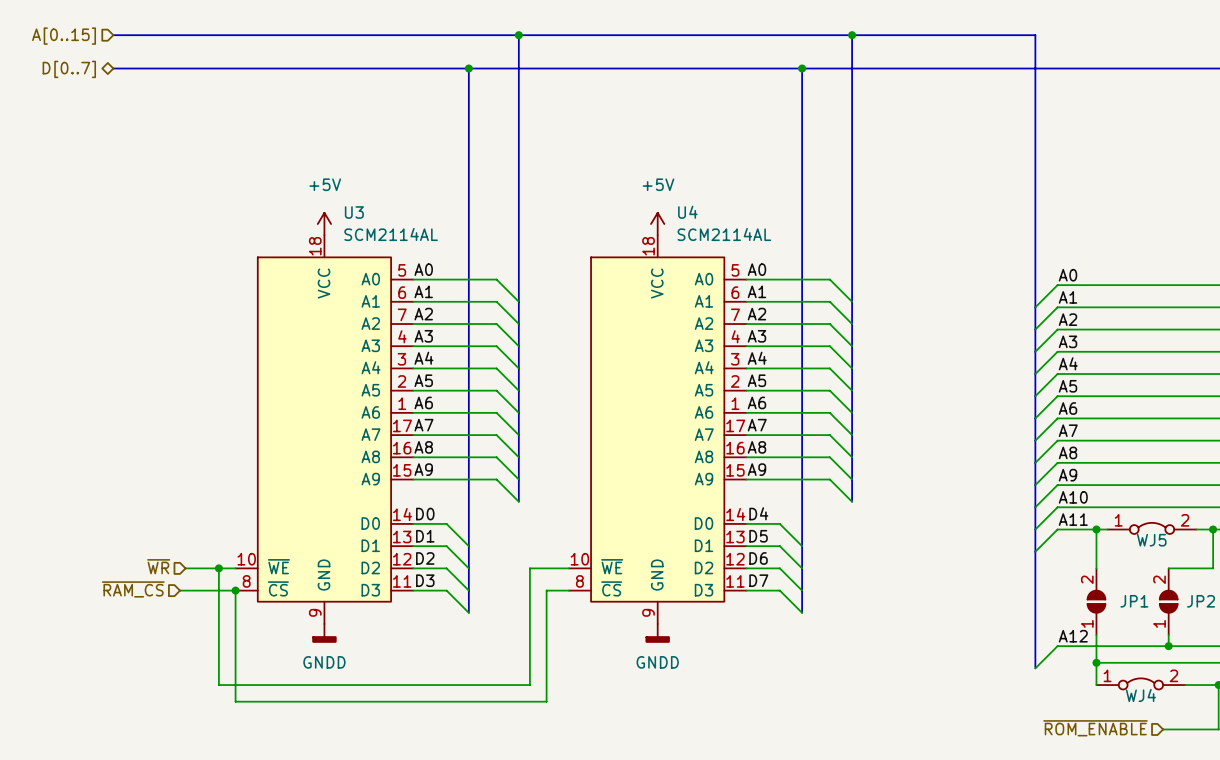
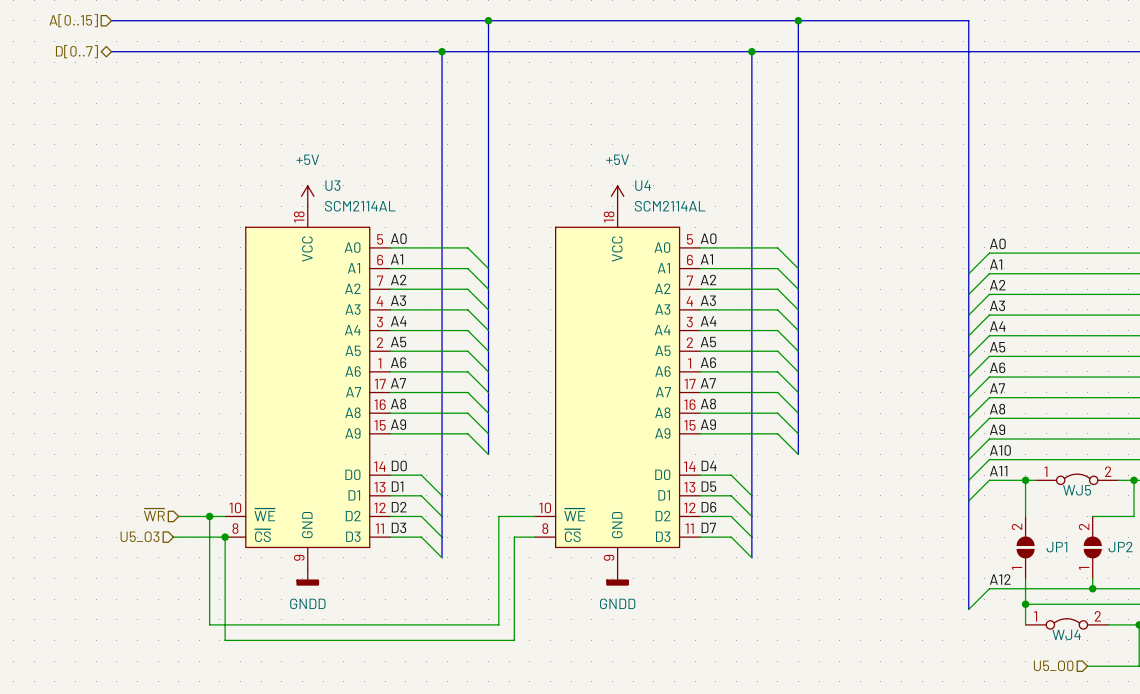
hierarchical label: ~{RAM_CS} (133, 589) -> U5_O3 (140, 536)
hierarchical label: ~{ROM_ENABLE} (1095, 728) -> U5_O0 (1053, 665)

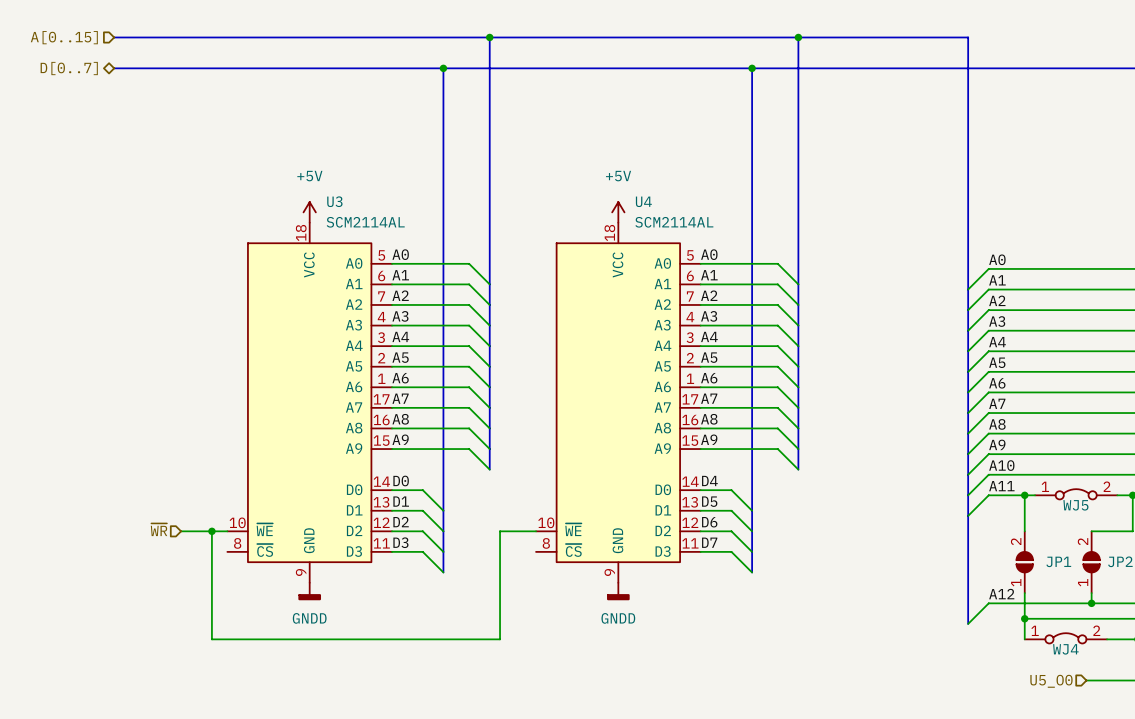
hierarchical label: U5_O3 (140, 536) -> none
wire: (173, 537) (225, 537) (225, 640) (514, 640) (514, 537) (534, 537) -> none
junction: (225, 537) -> none

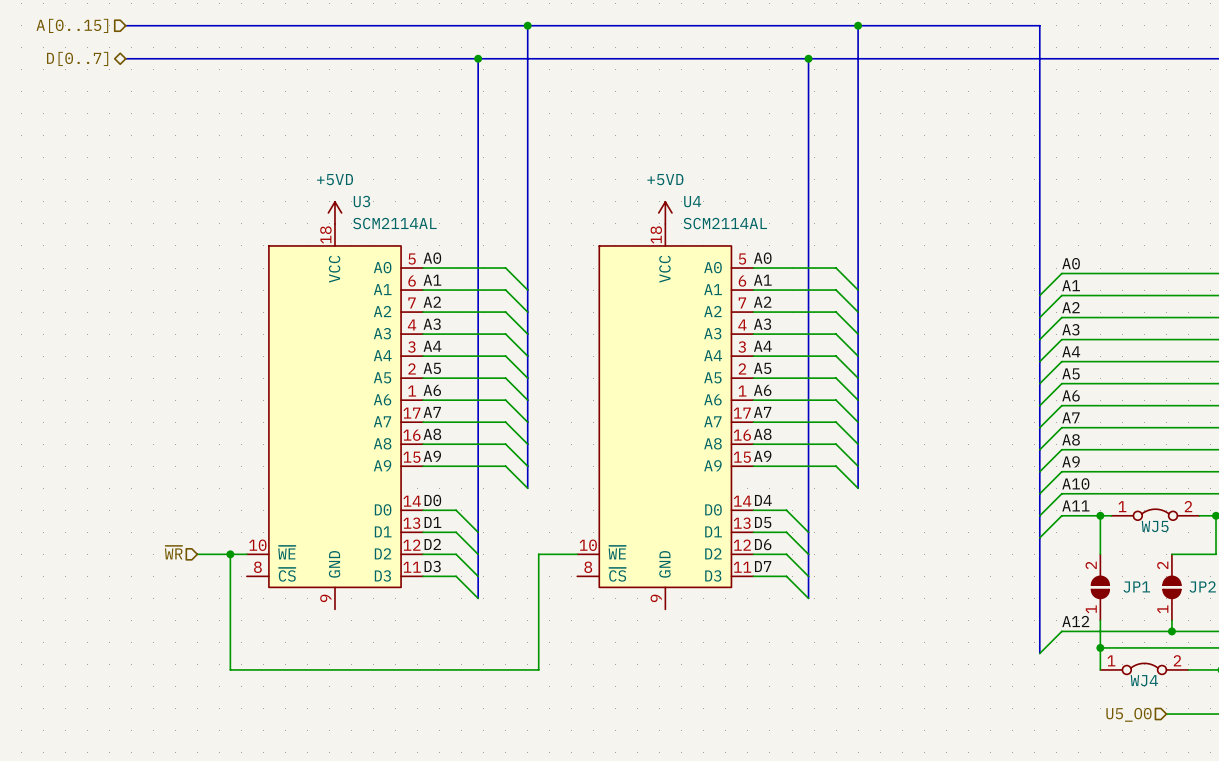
power symbol: +5V (309, 212) -> +5VD (334, 212)
power symbol: +5V (618, 212) -> +5VD (665, 212)
power symbol: GNDD (309, 591) -> none
power symbol: GNDD (618, 591) -> none

